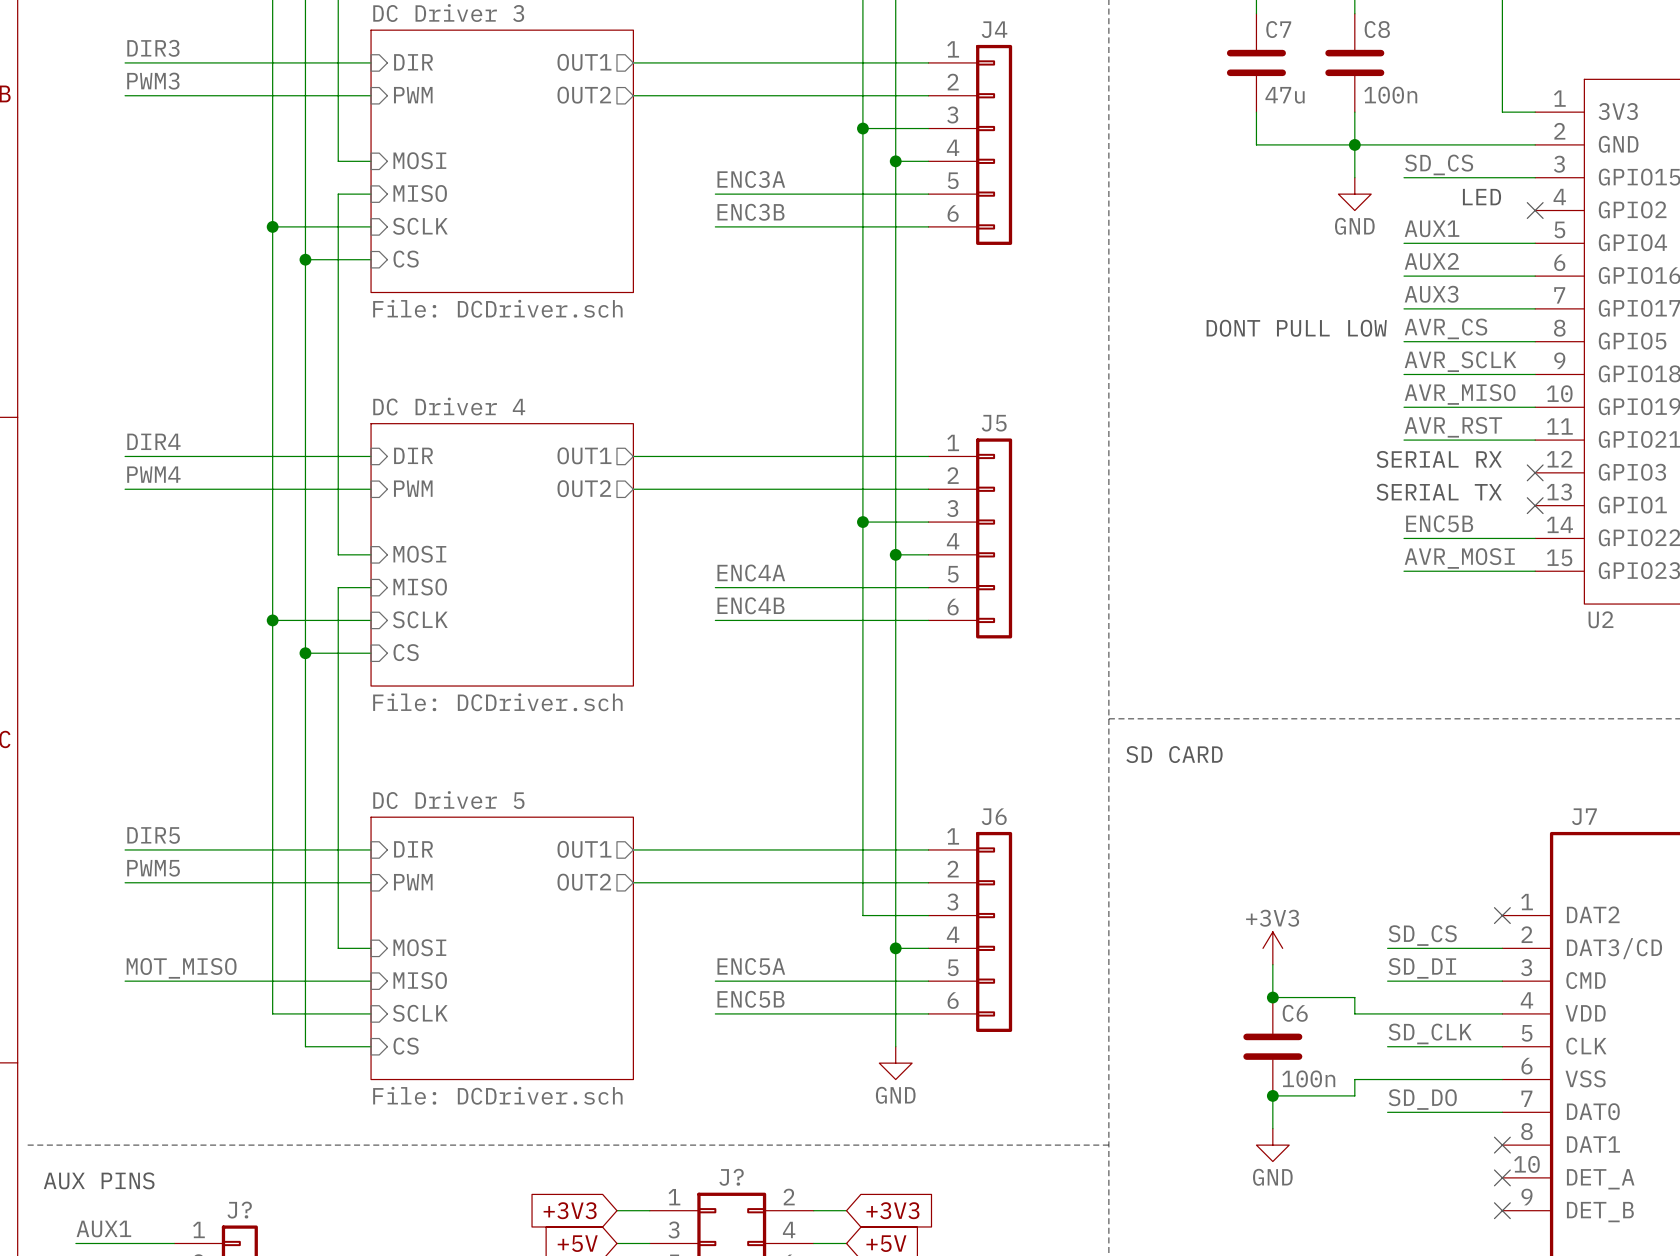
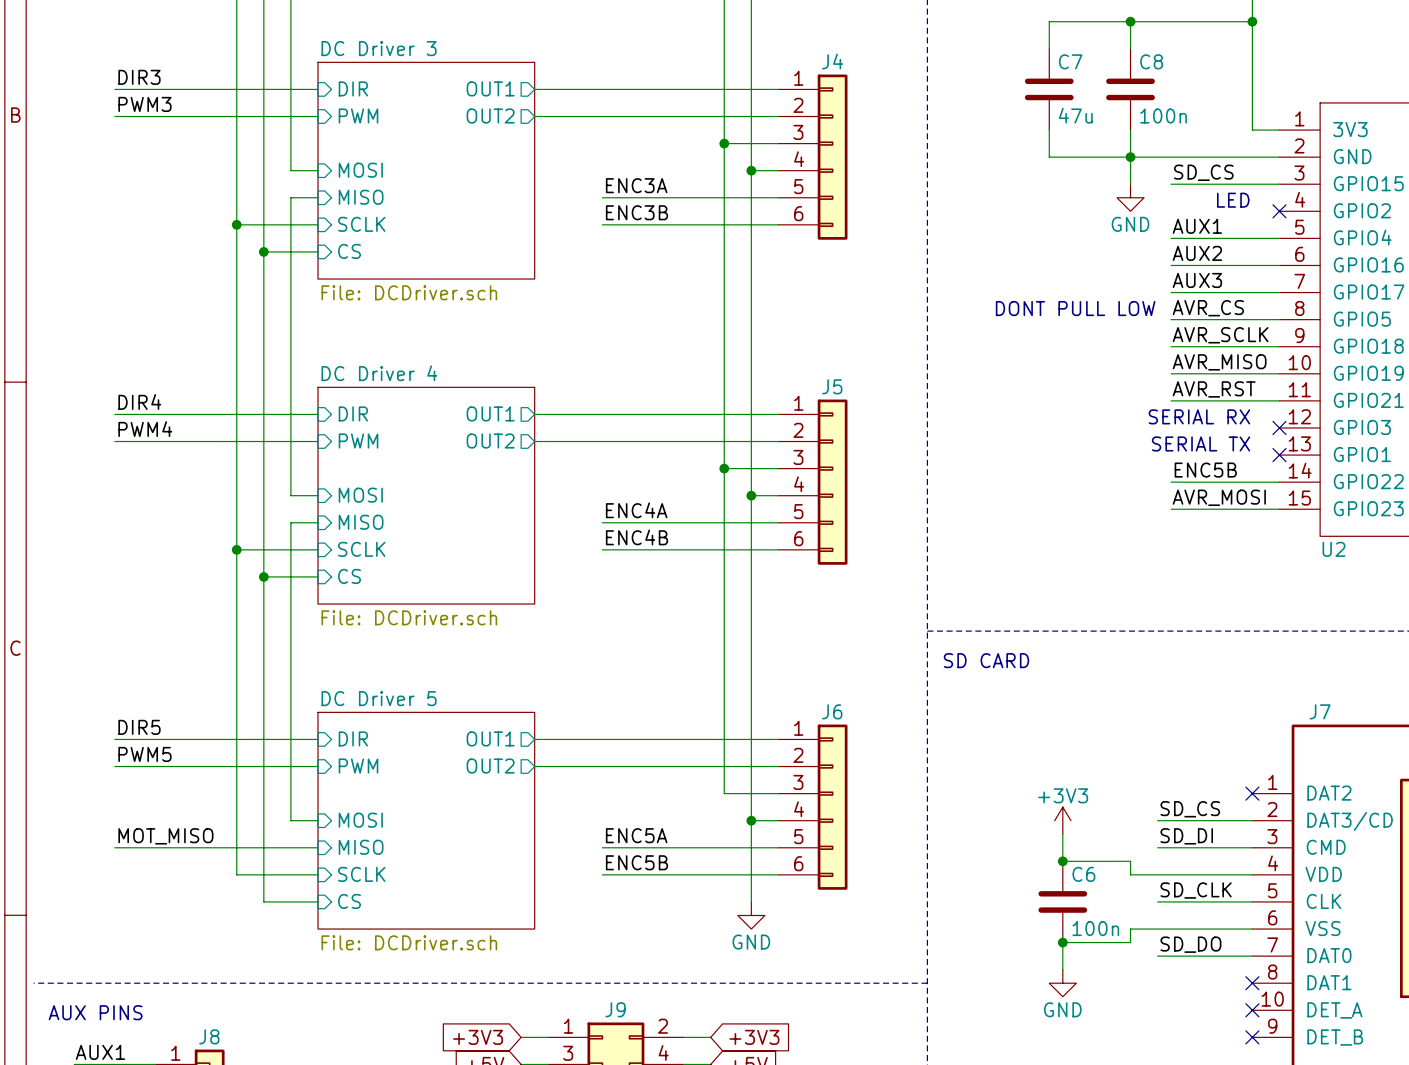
J? name: J? (731, 1177) -> J9 (615, 1009)
J? name: J? (239, 1210) -> J8 (209, 1036)

